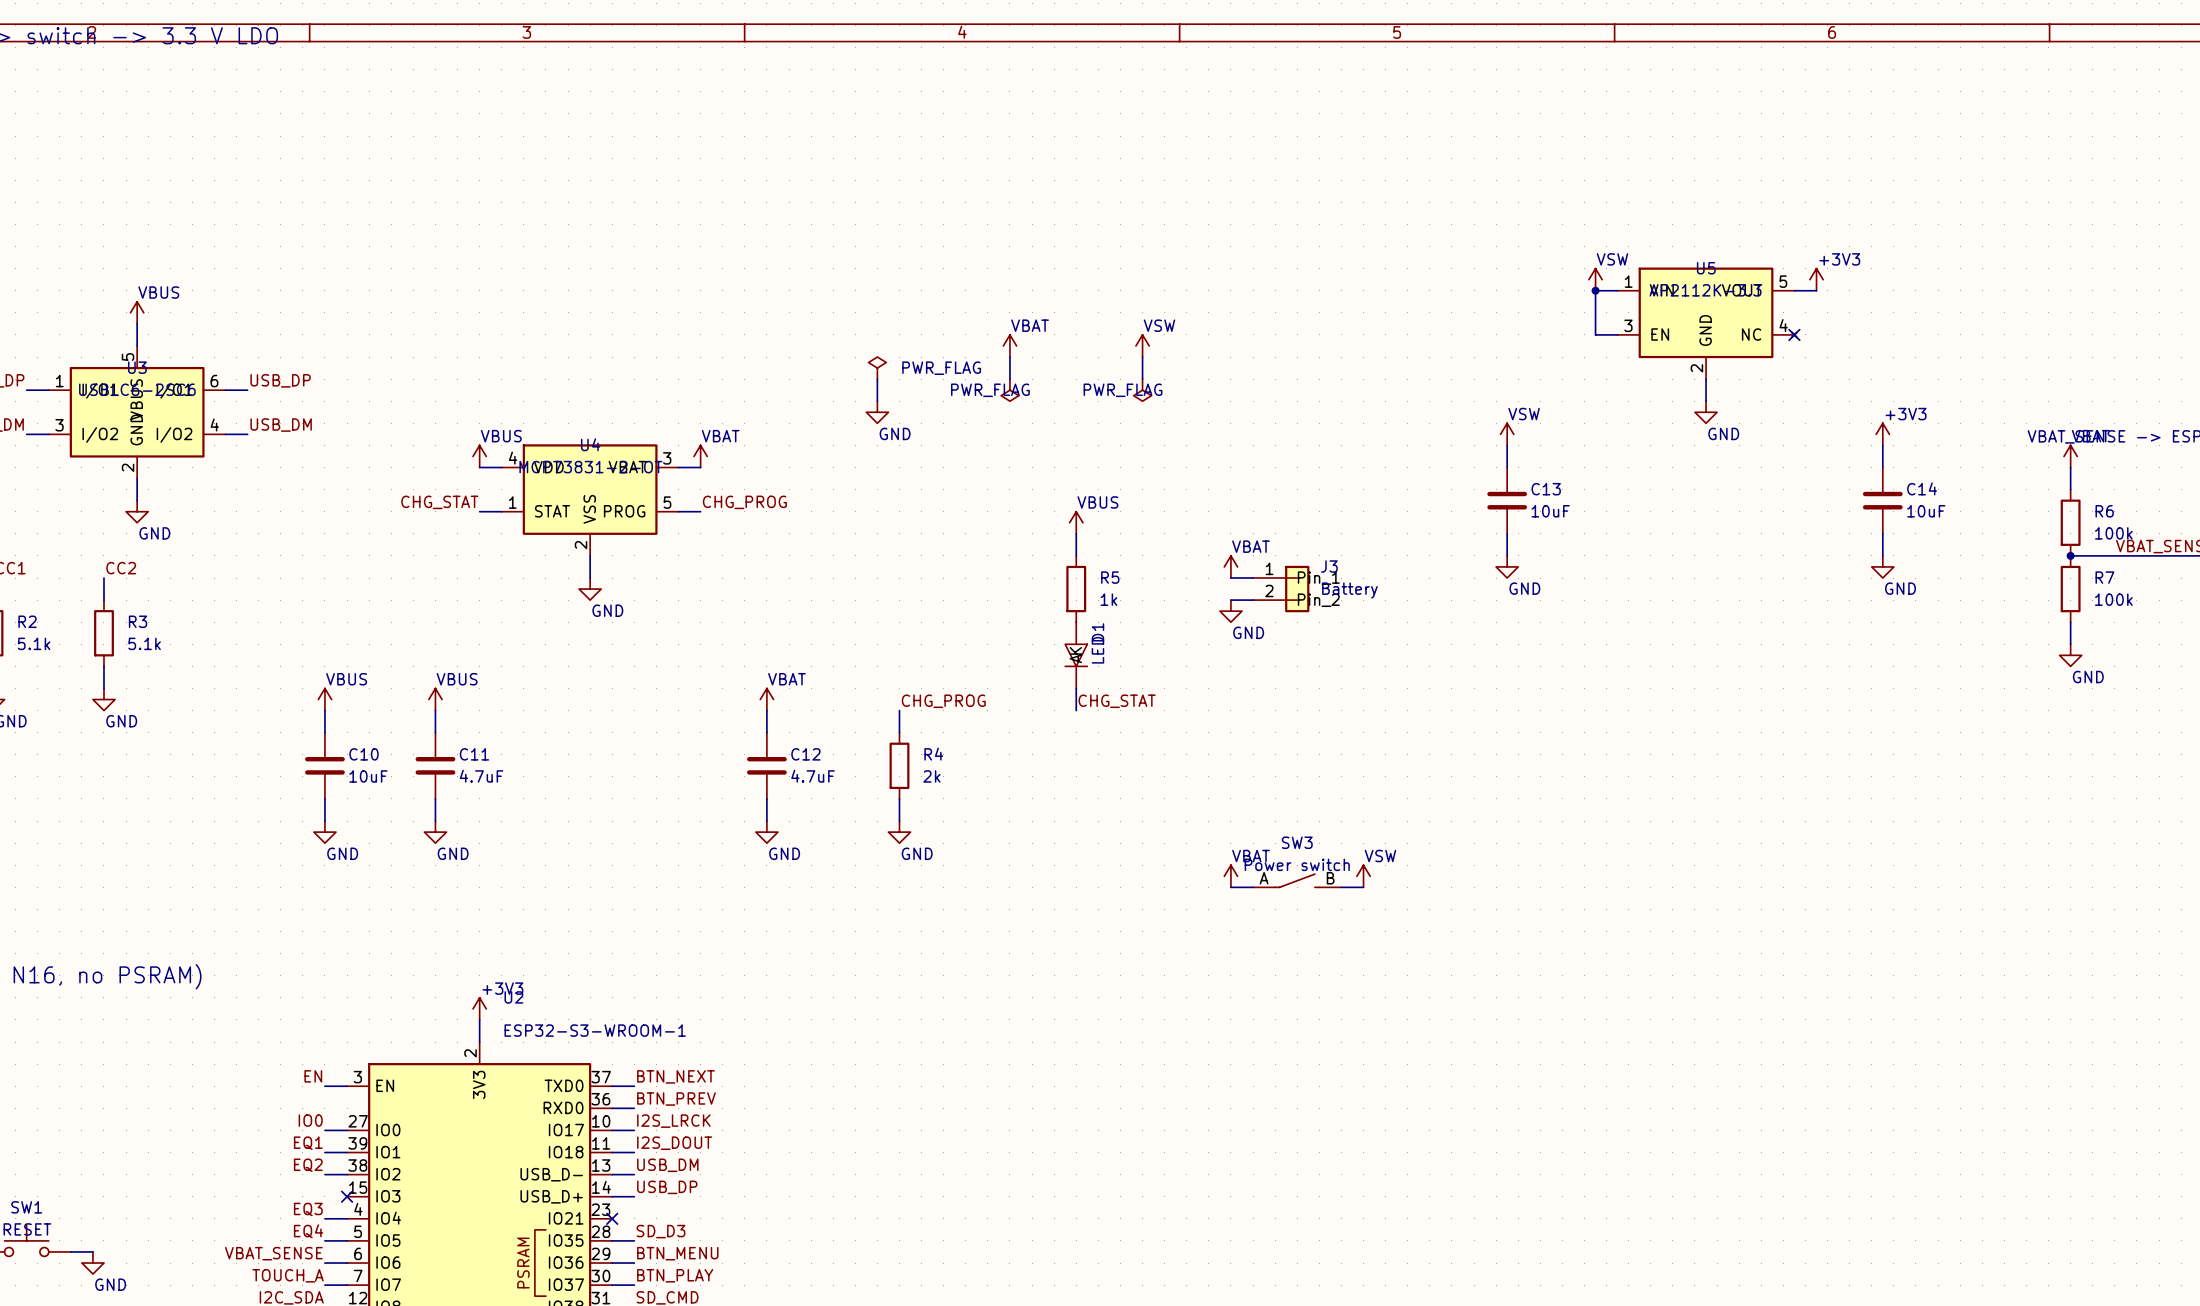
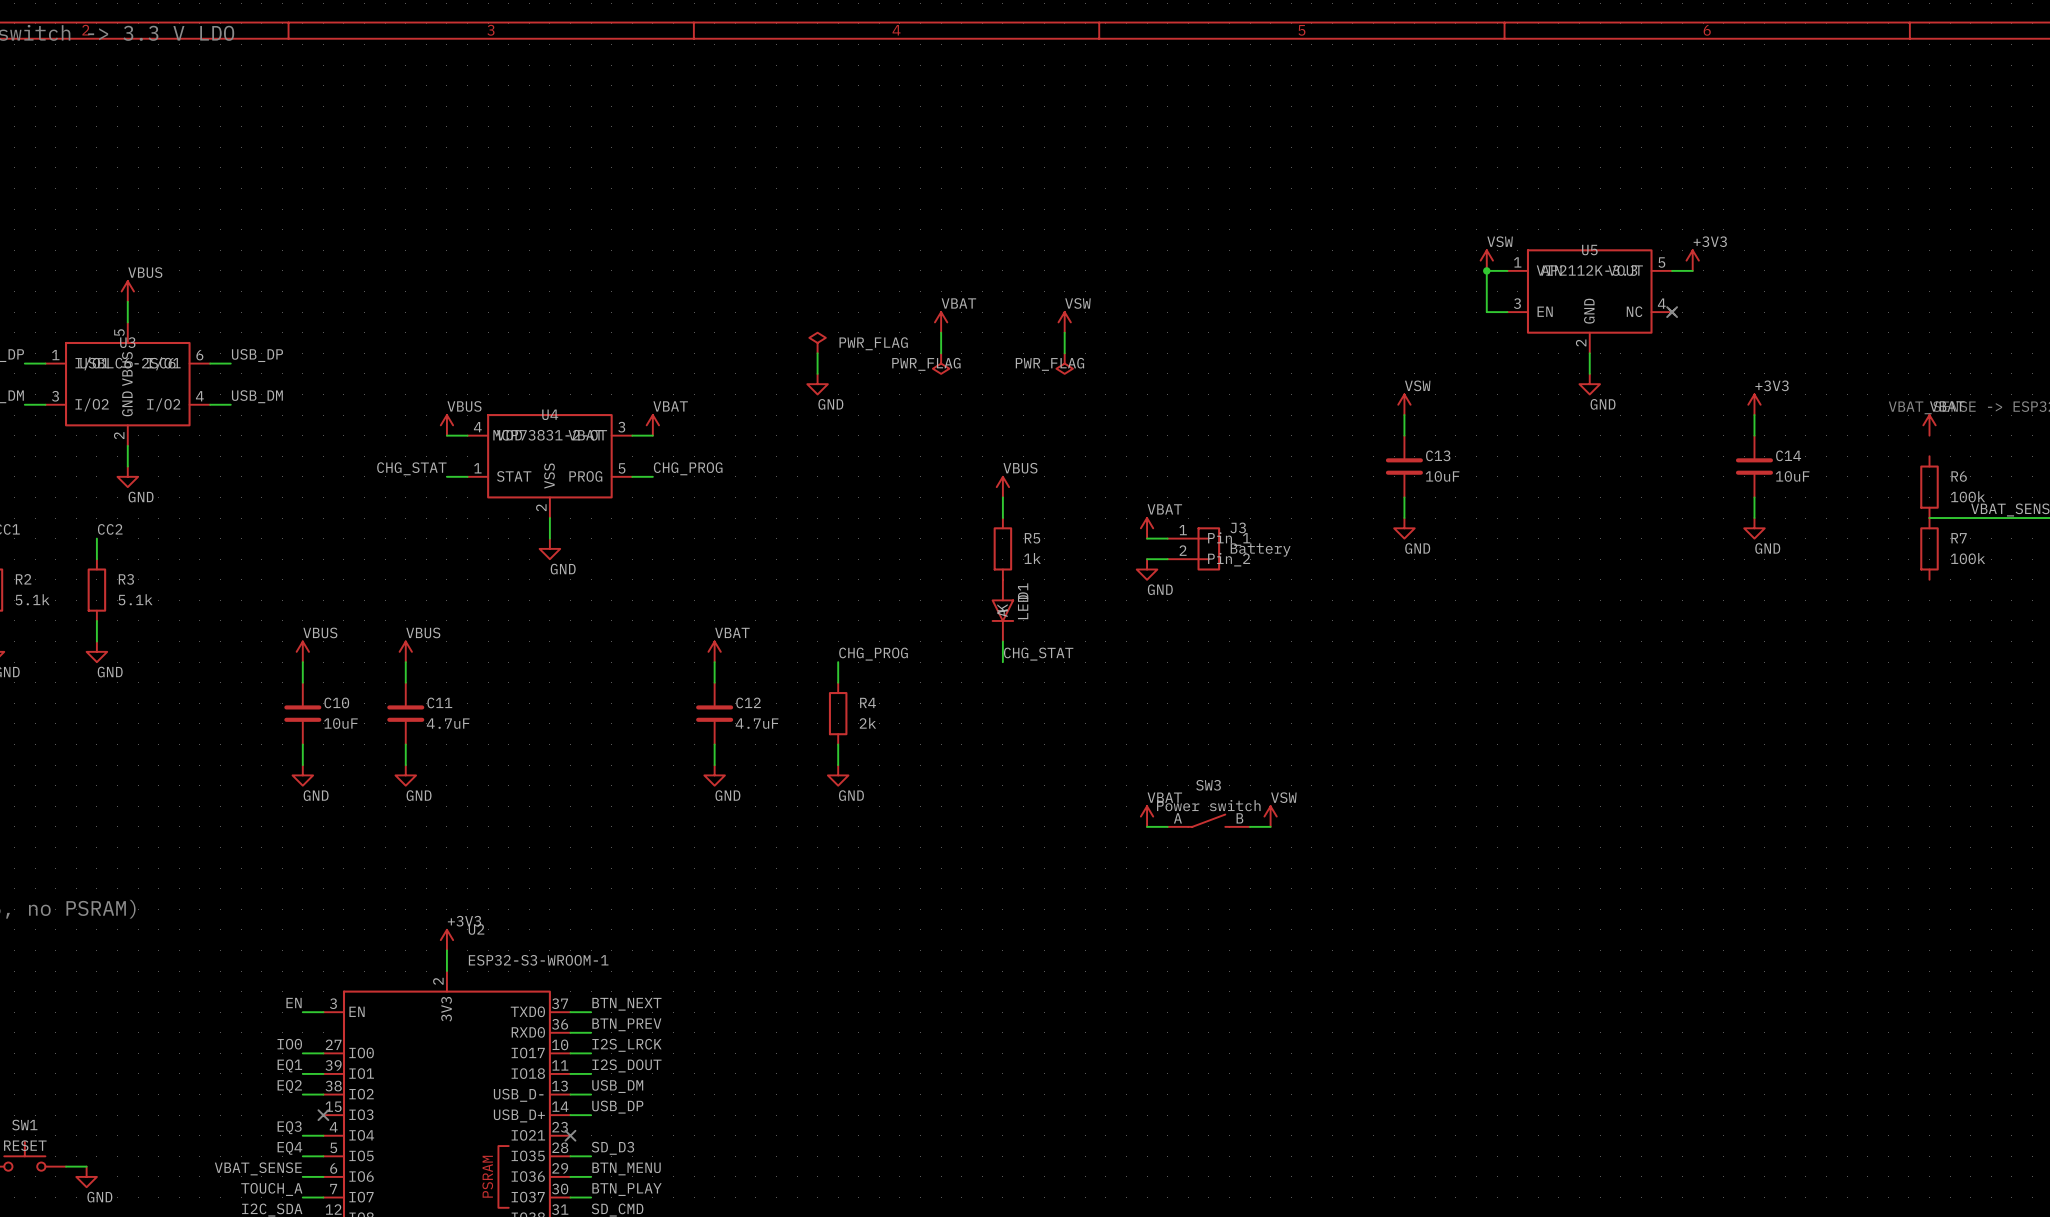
wire: (2070, 467) (2070, 489) -> none
junction: (2070, 555) -> none
wire: (2070, 622) (2070, 644) -> none
power symbol: GND (2070, 655) -> none

